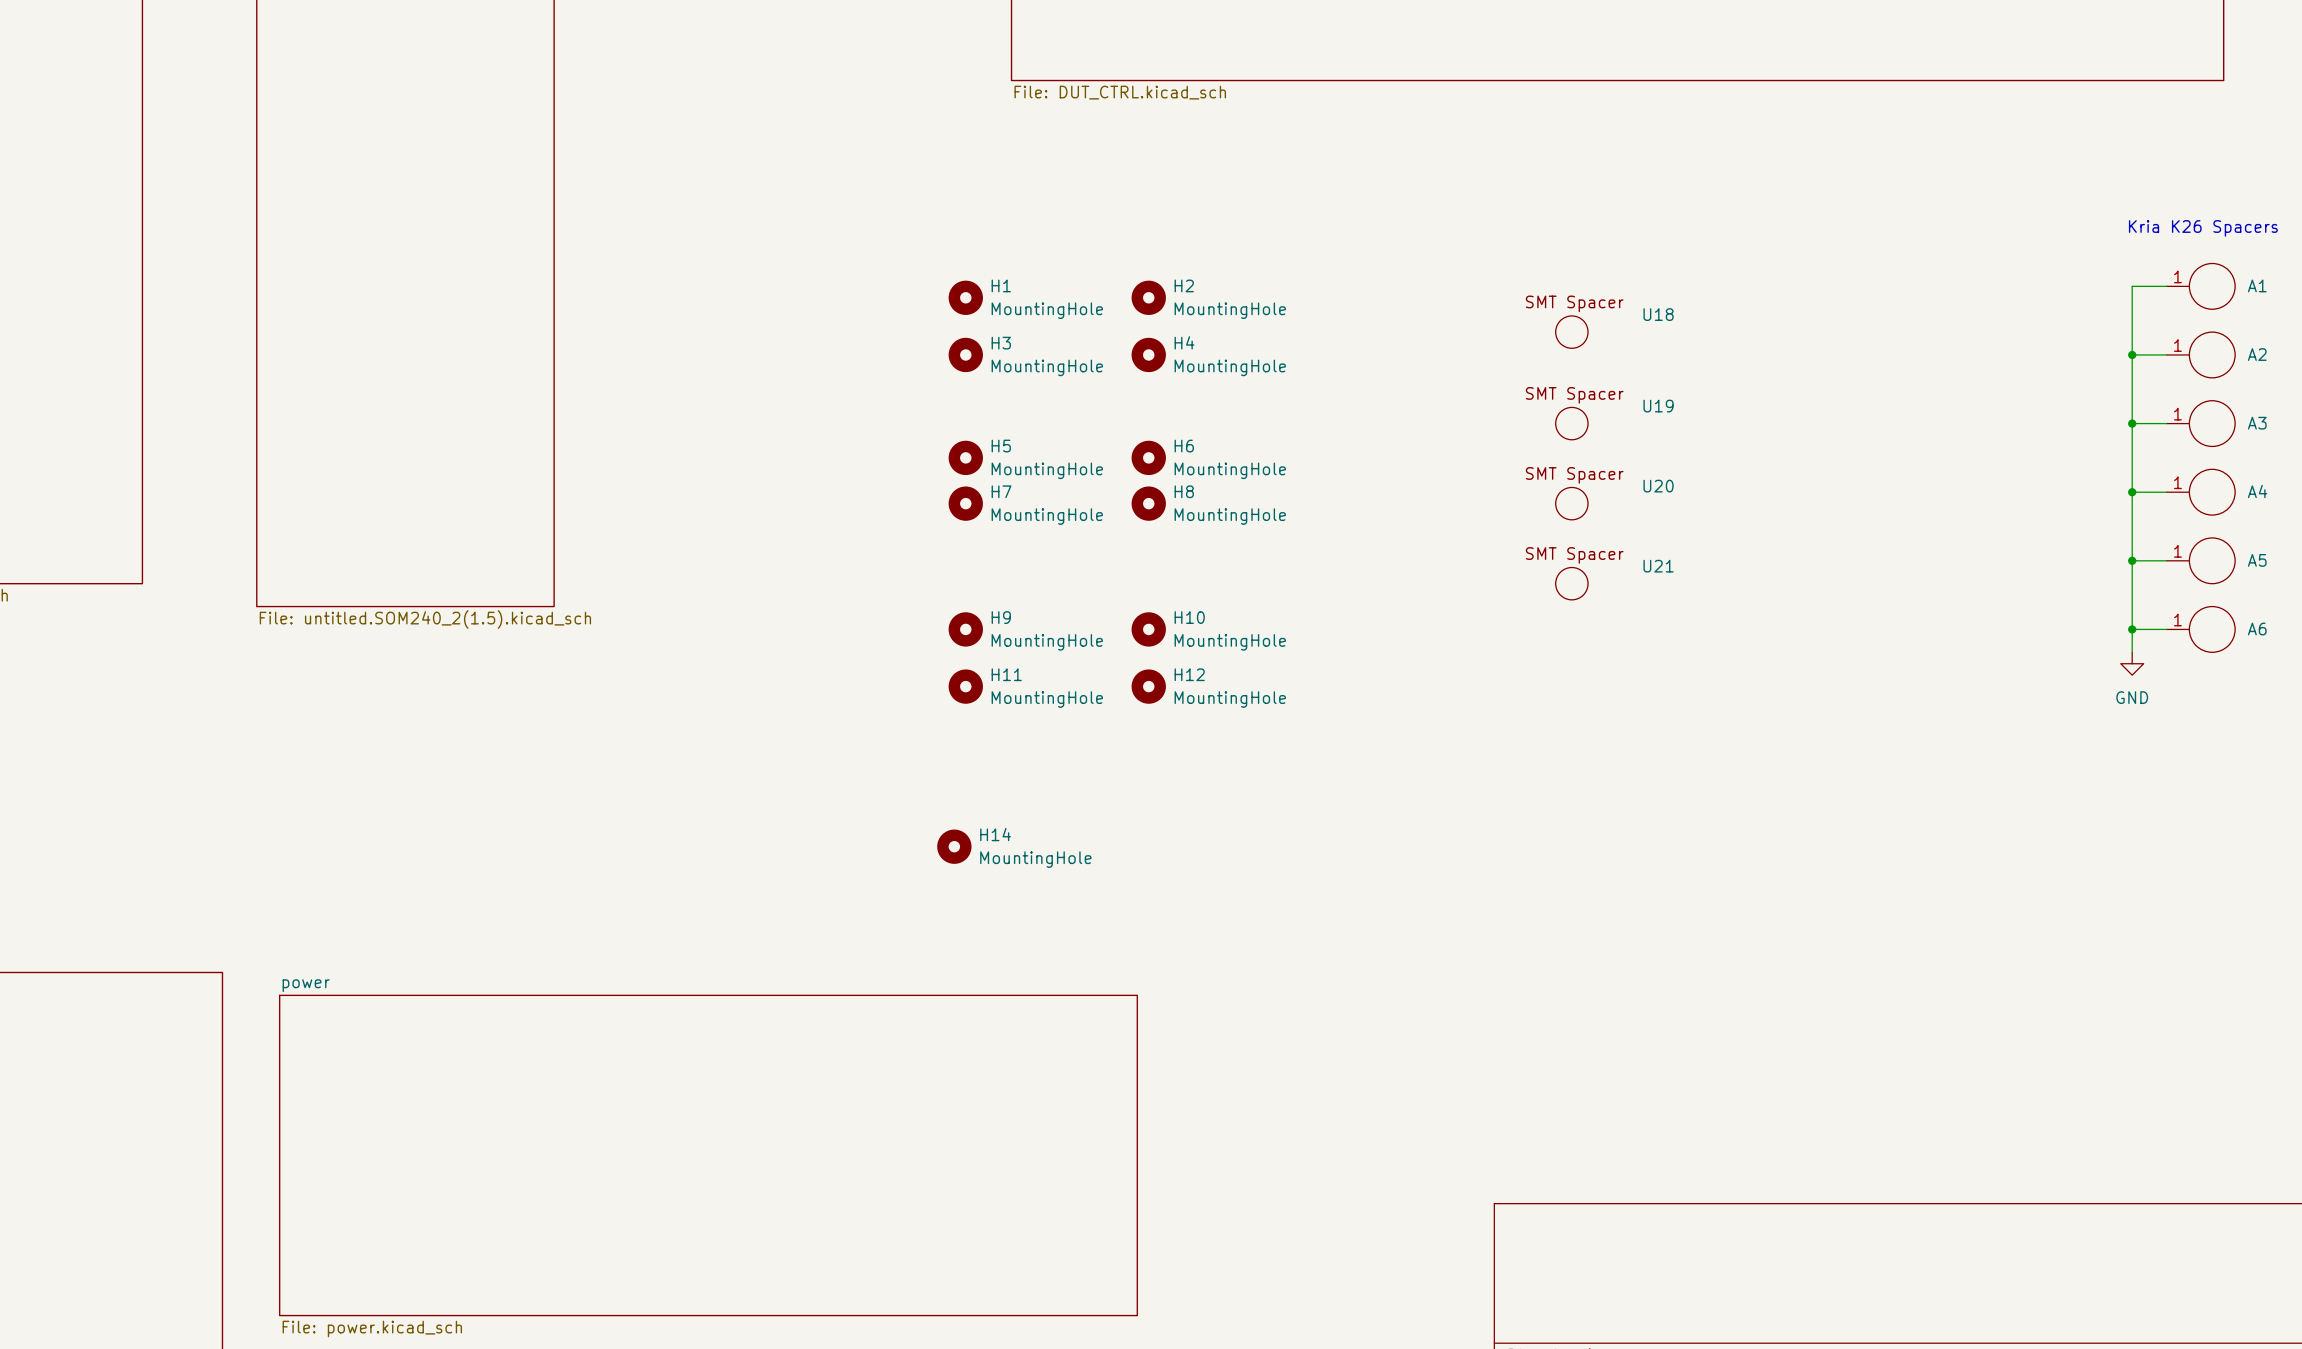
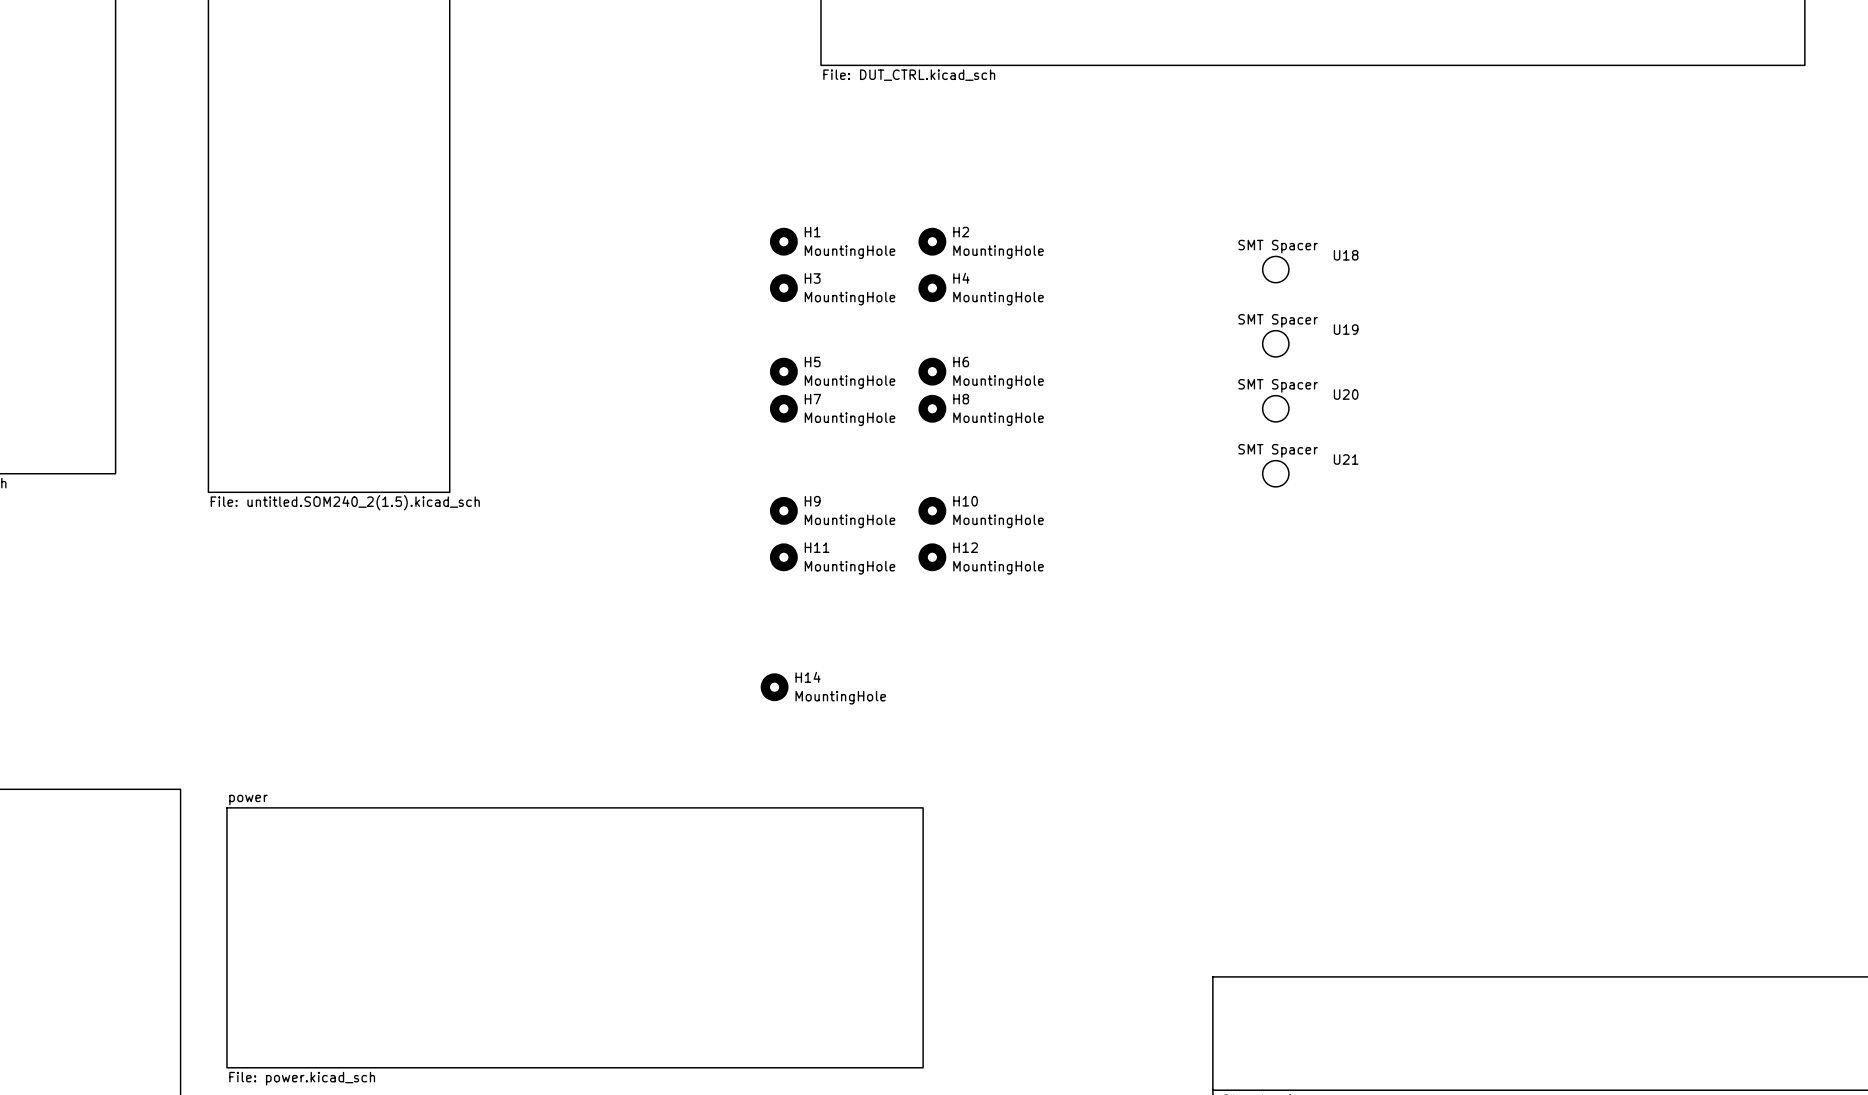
text: Kria K26 Spacers (2203, 228) -> none
wire: (2166, 286) (2132, 286) (2132, 652) -> none
A1: (2200, 286) -> none
wire: (2132, 354) (2166, 354) -> none
junction: (2132, 354) -> none
A2: (2200, 354) -> none
wire: (2132, 423) (2166, 423) -> none
junction: (2132, 423) -> none
A3: (2200, 423) -> none
wire: (2132, 492) (2166, 492) -> none
junction: (2132, 492) -> none
A4: (2200, 492) -> none
wire: (2132, 560) (2166, 560) -> none
junction: (2132, 560) -> none
A5: (2200, 560) -> none
wire: (2132, 629) (2166, 629) -> none
junction: (2132, 629) -> none
A6: (2200, 629) -> none
power symbol: GND (2132, 663) -> none

